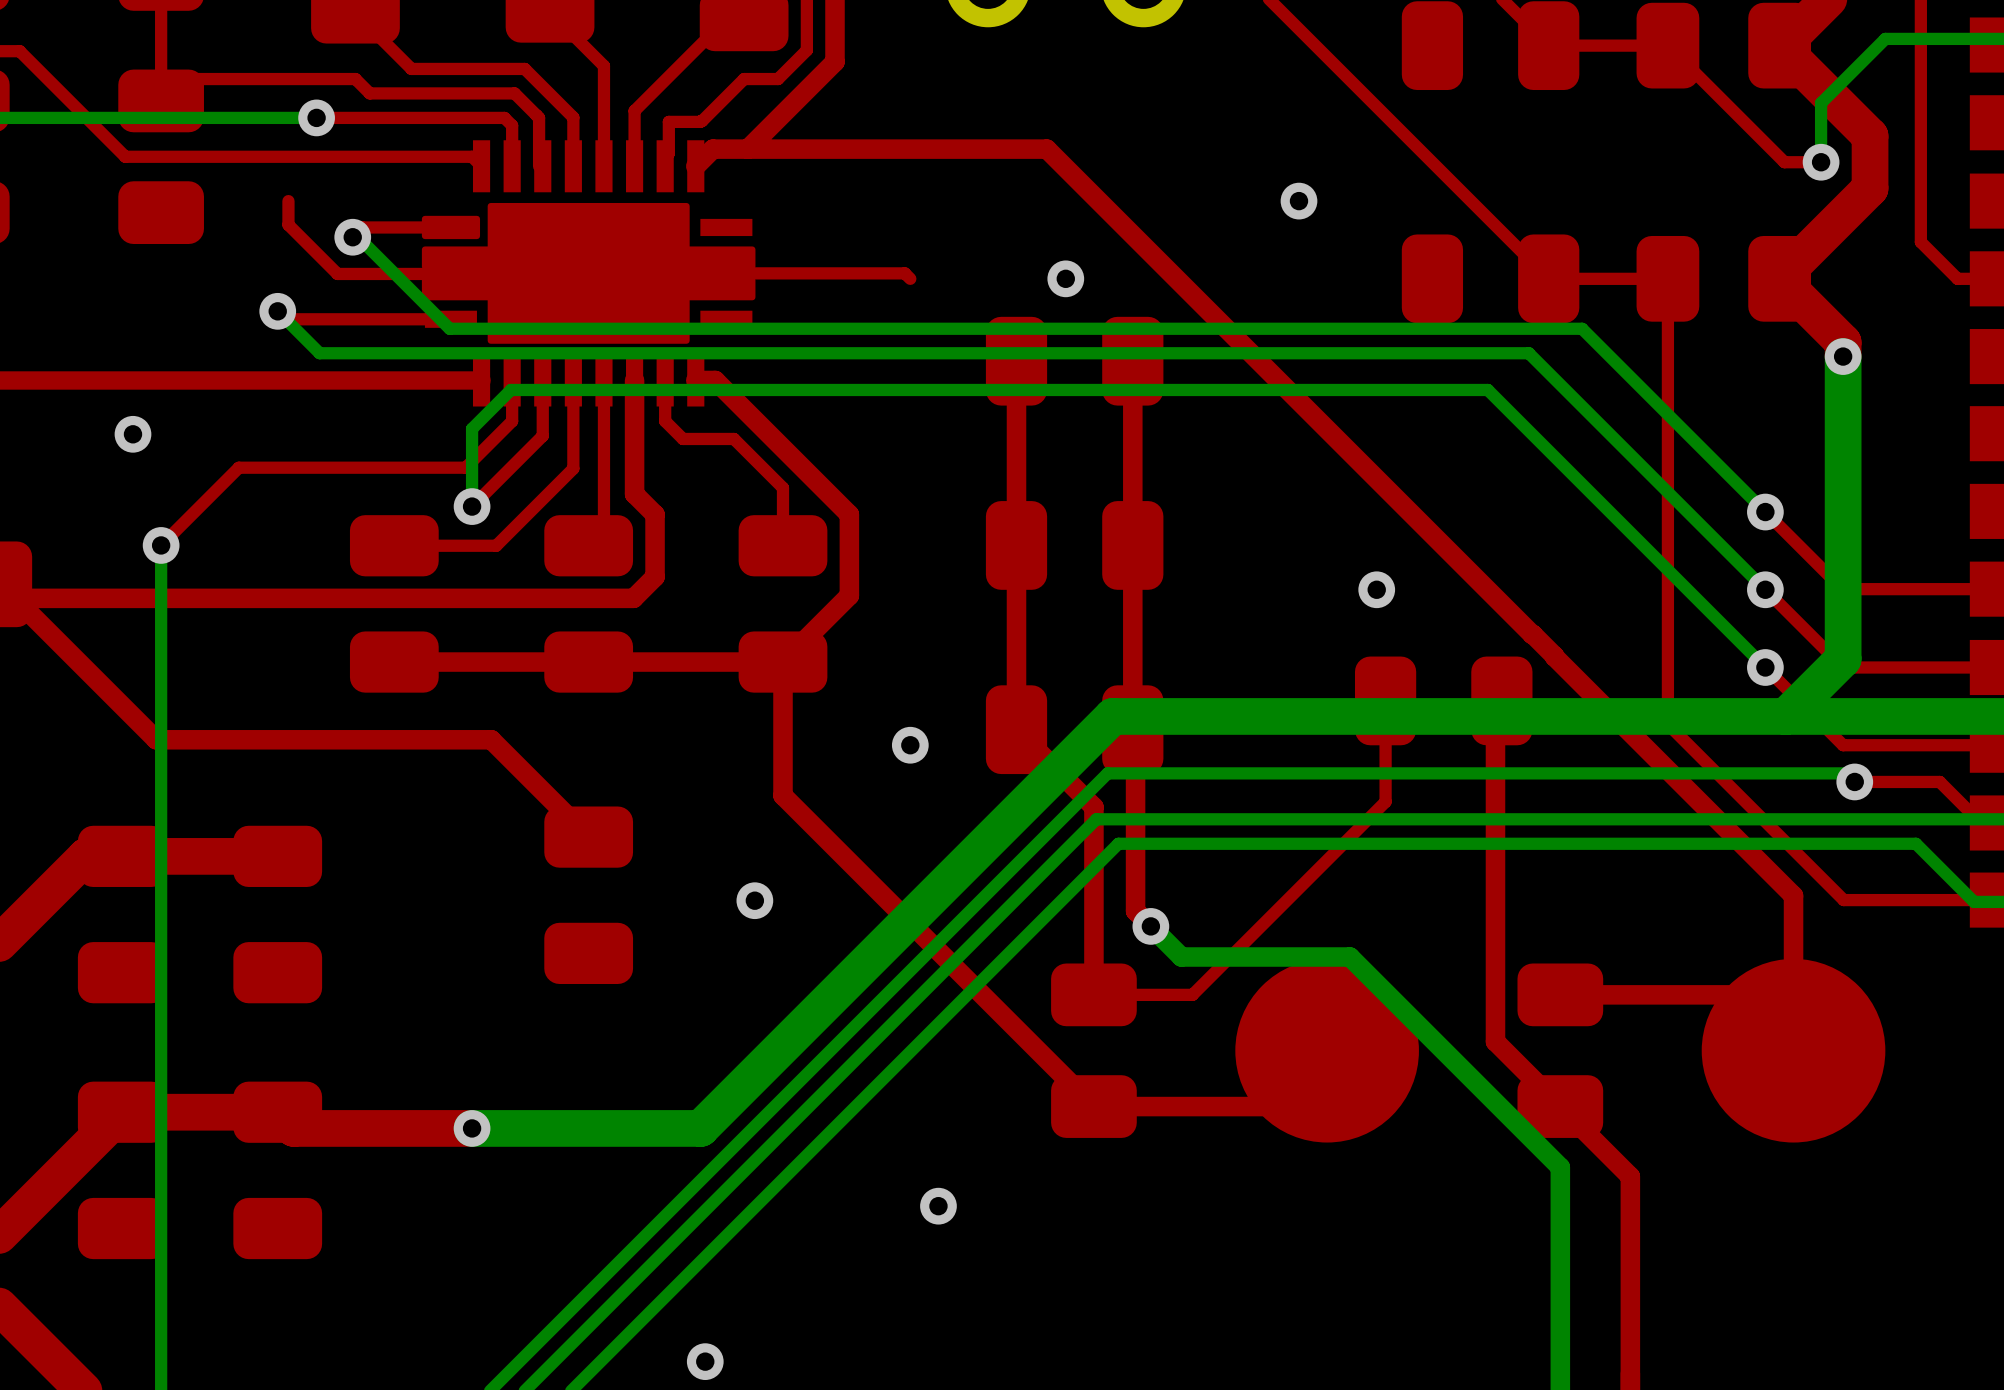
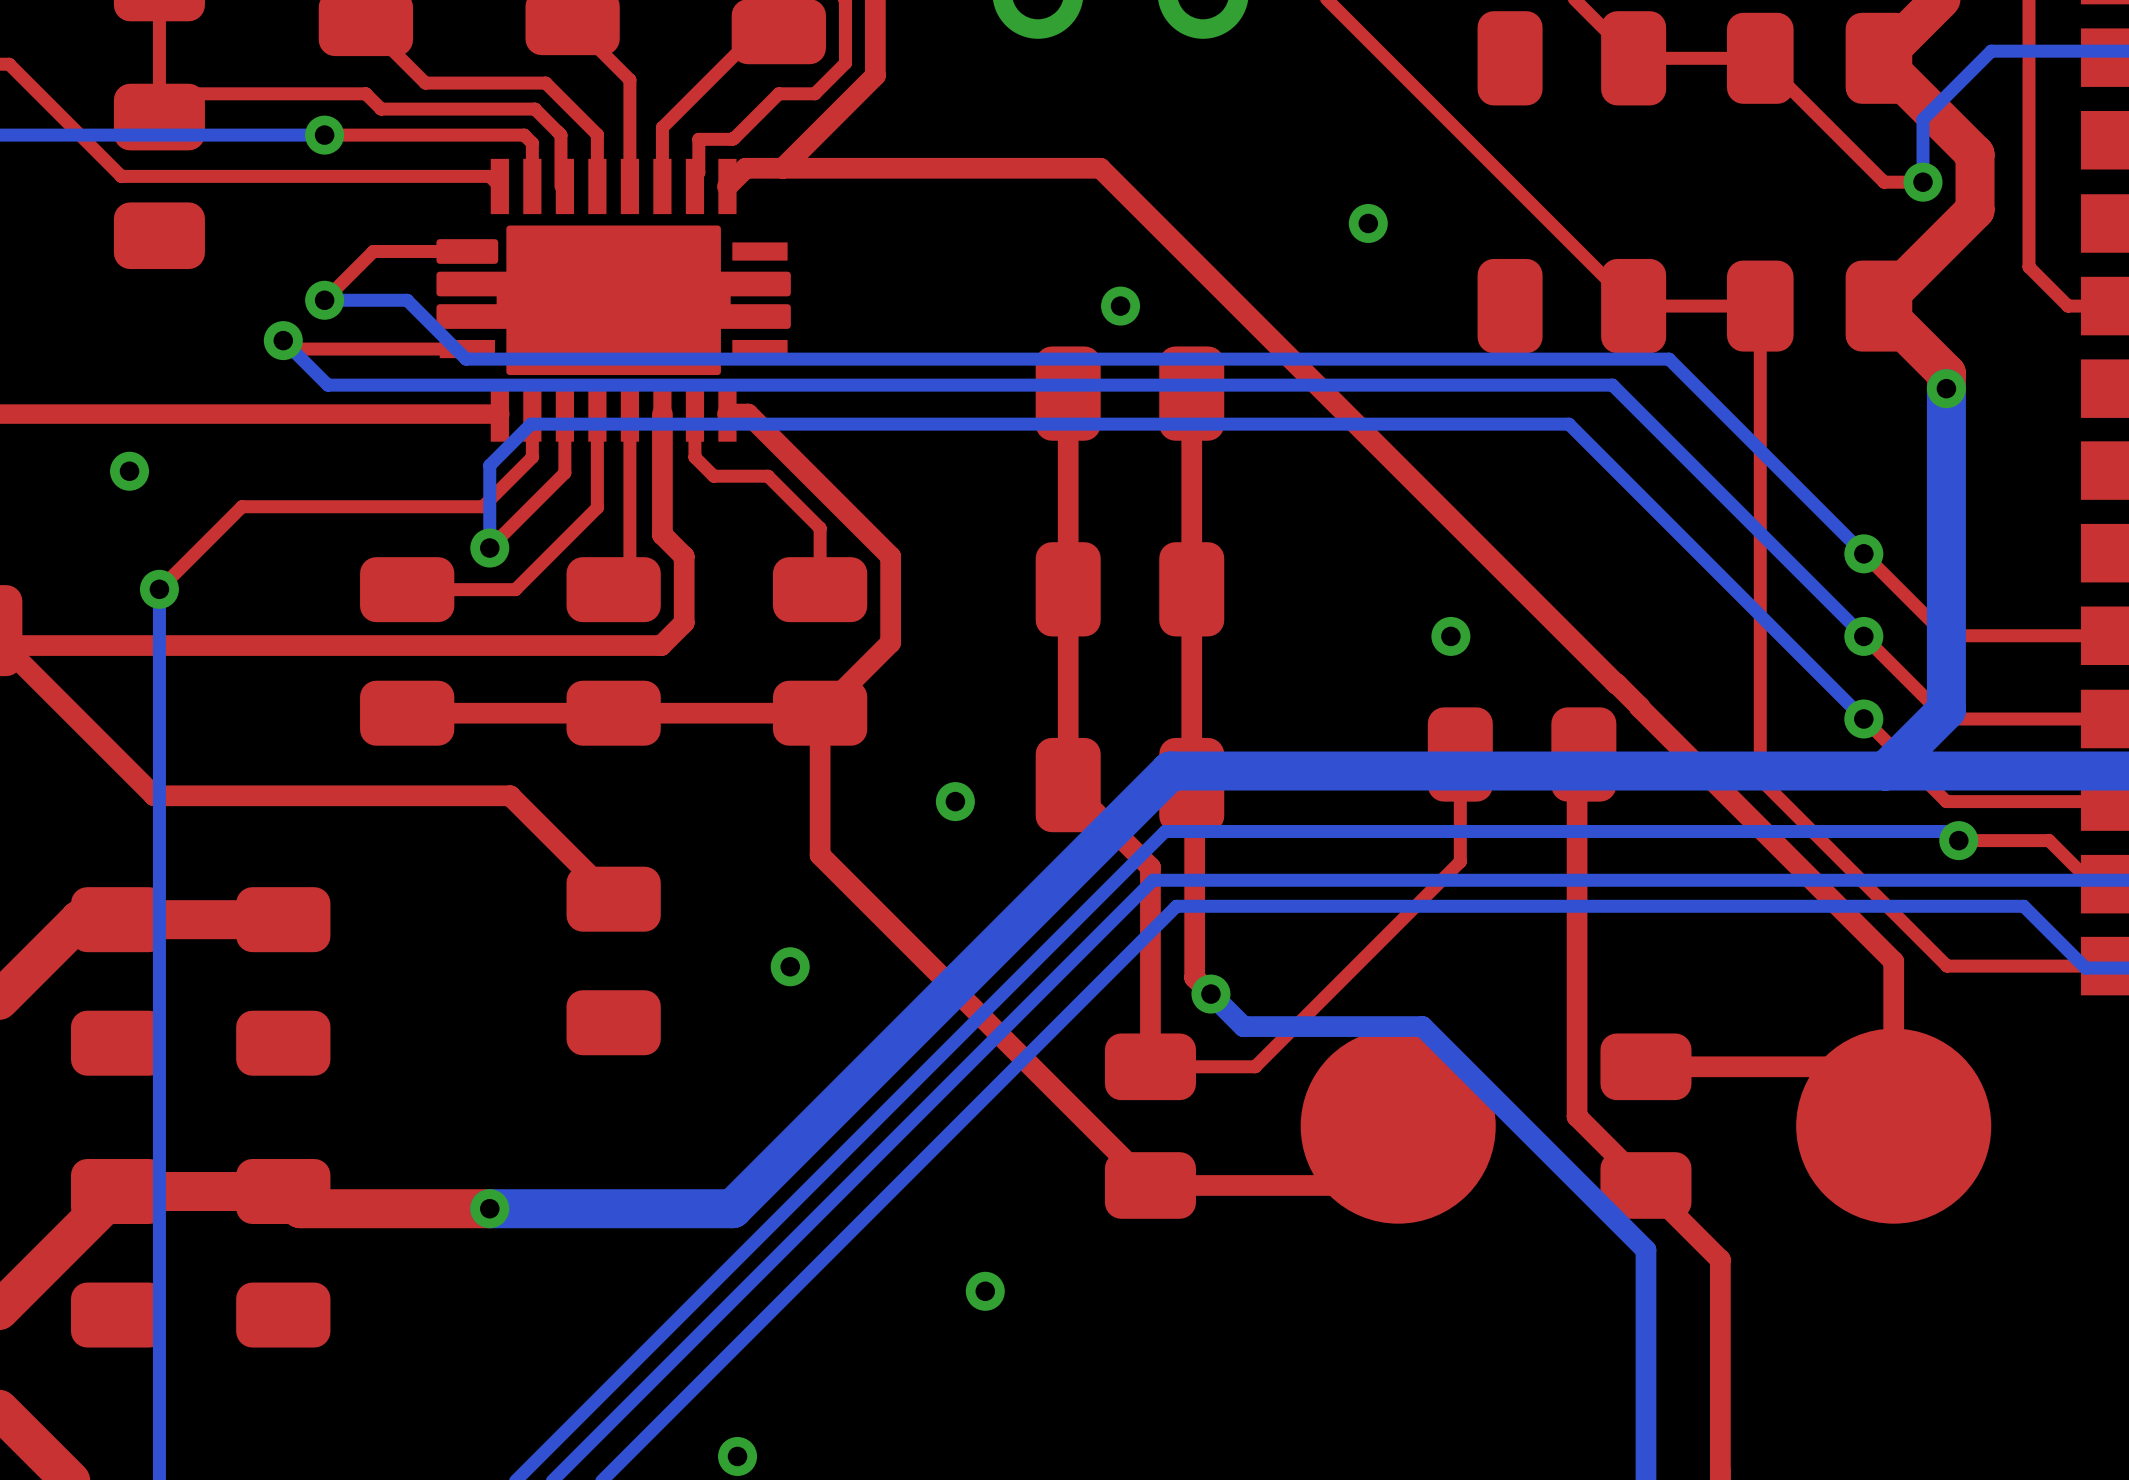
top track: (288, 201) (288, 224) (337, 273) (588, 273) -> none
top track: none -> (362, 261) (324, 300)
bottom track: (352, 237) (358, 237) (394, 273) -> (324, 300) (407, 300)
via position: (352, 237) -> (324, 300)
top track: (588, 273) (904, 273) (910, 278) -> none

